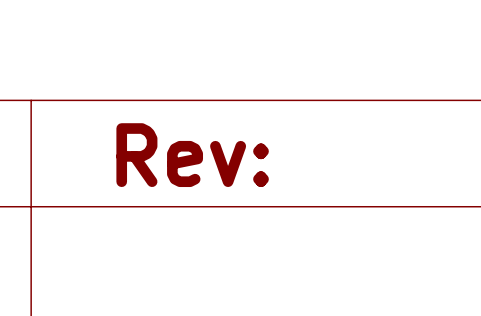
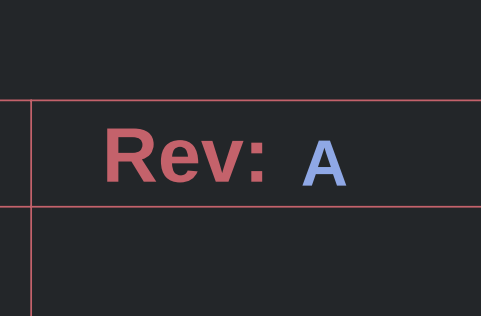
text: none -> A (324, 163)

